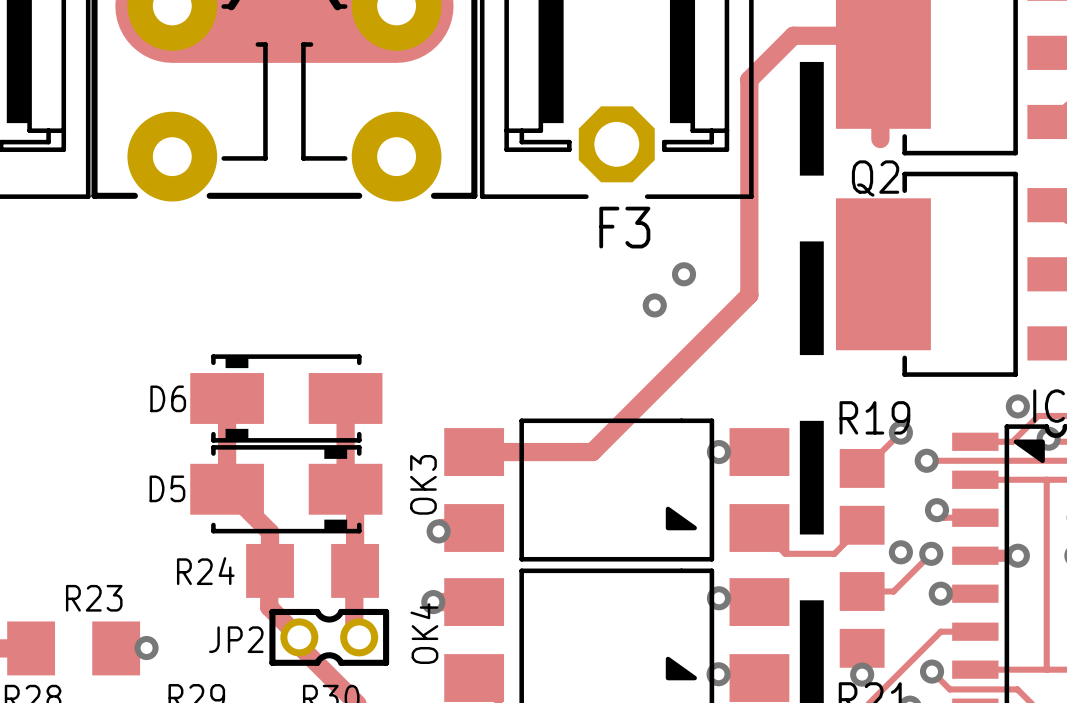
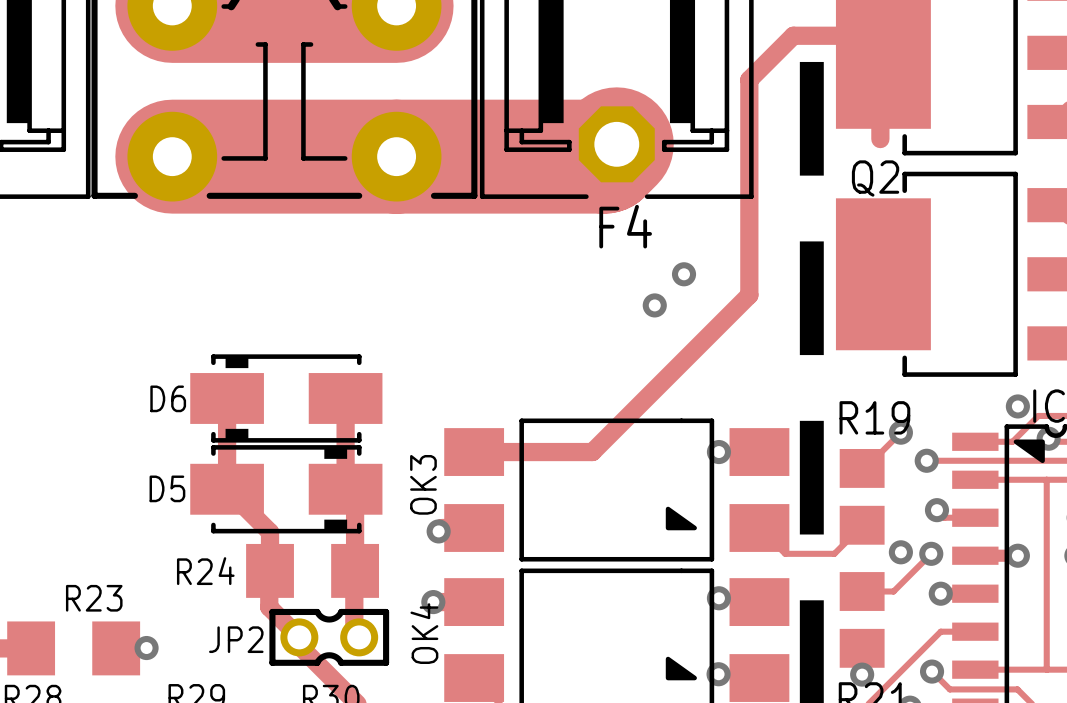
track: none -> (616, 144) (604, 156) (172, 156)
F3 name: F3 (624, 227) -> F4 (625, 226)

